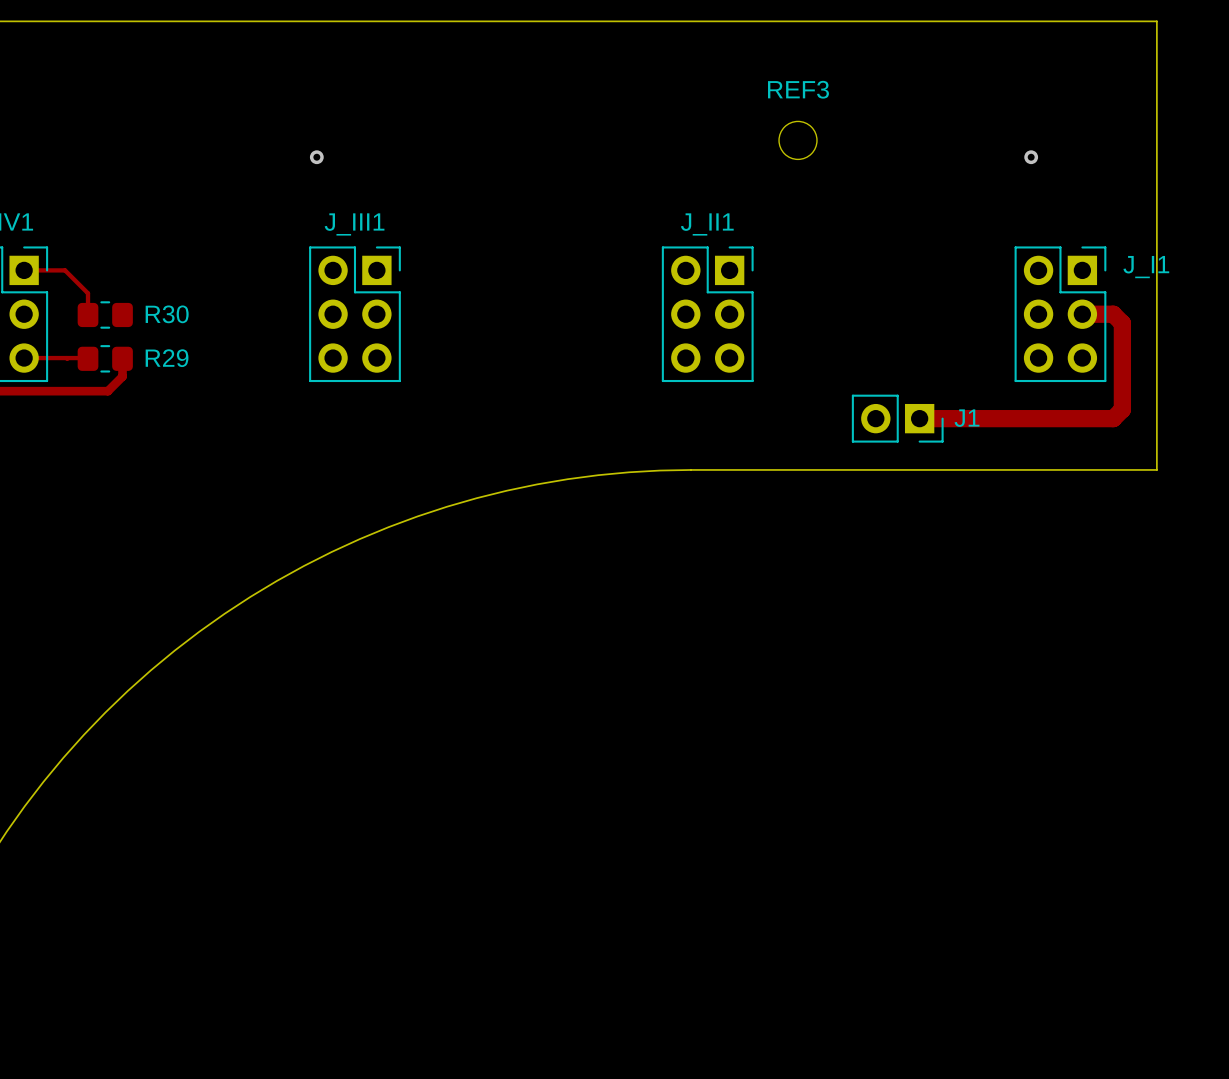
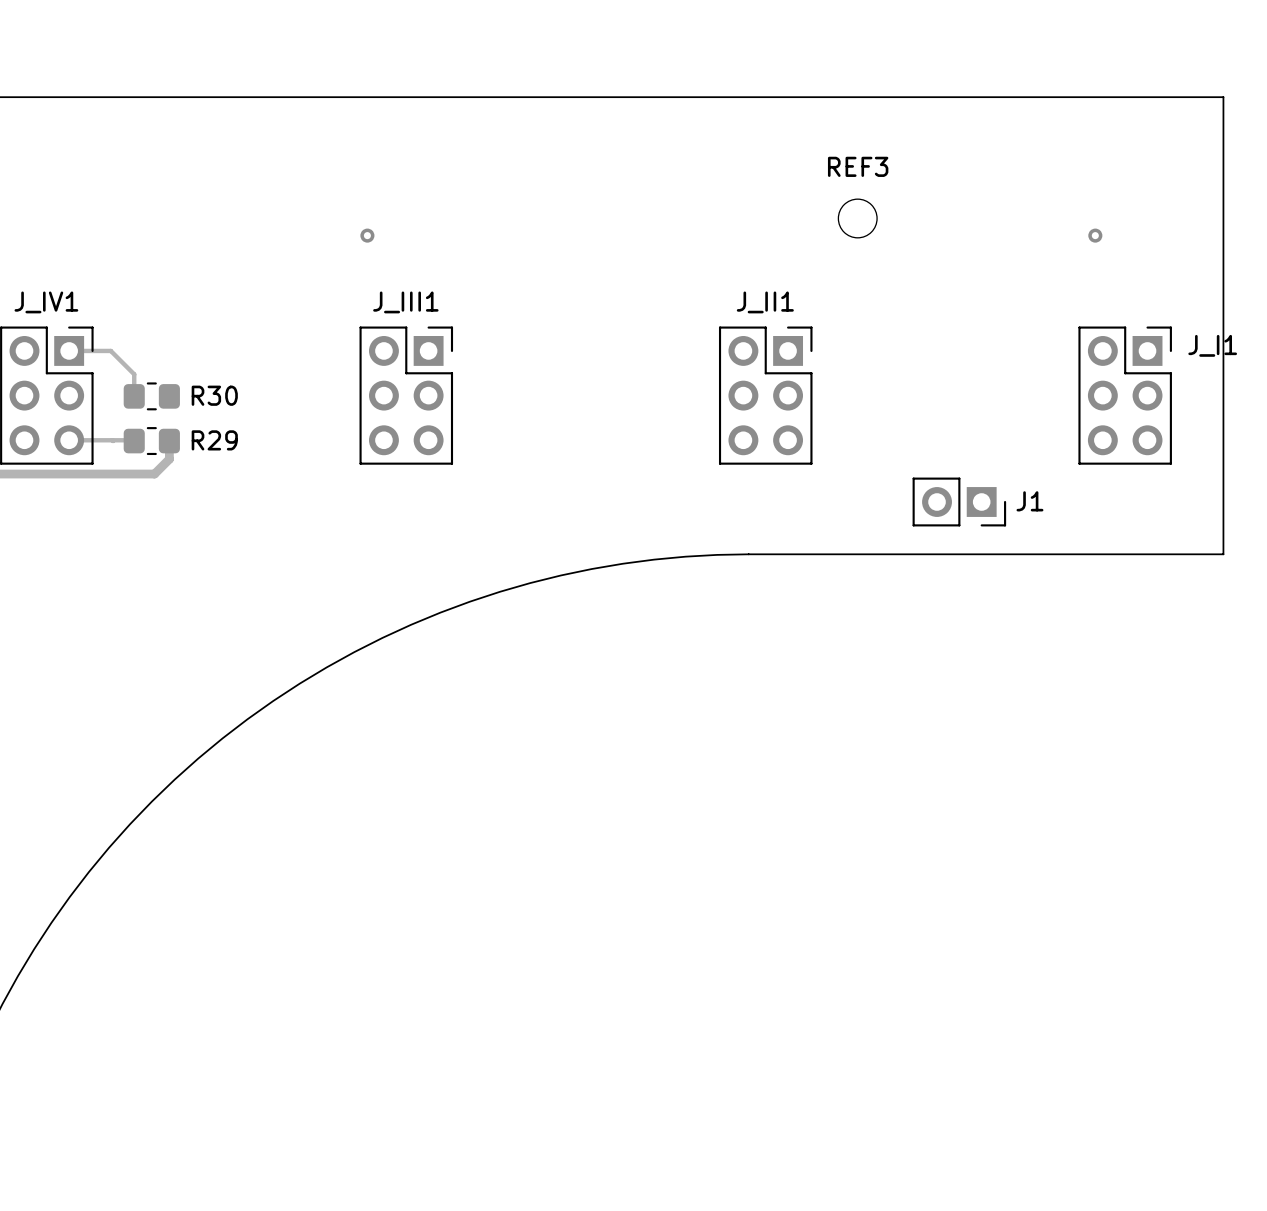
track: (1082, 314) (1113, 314) (1122, 323) (1122, 409) (1113, 418) (919, 418) -> none

